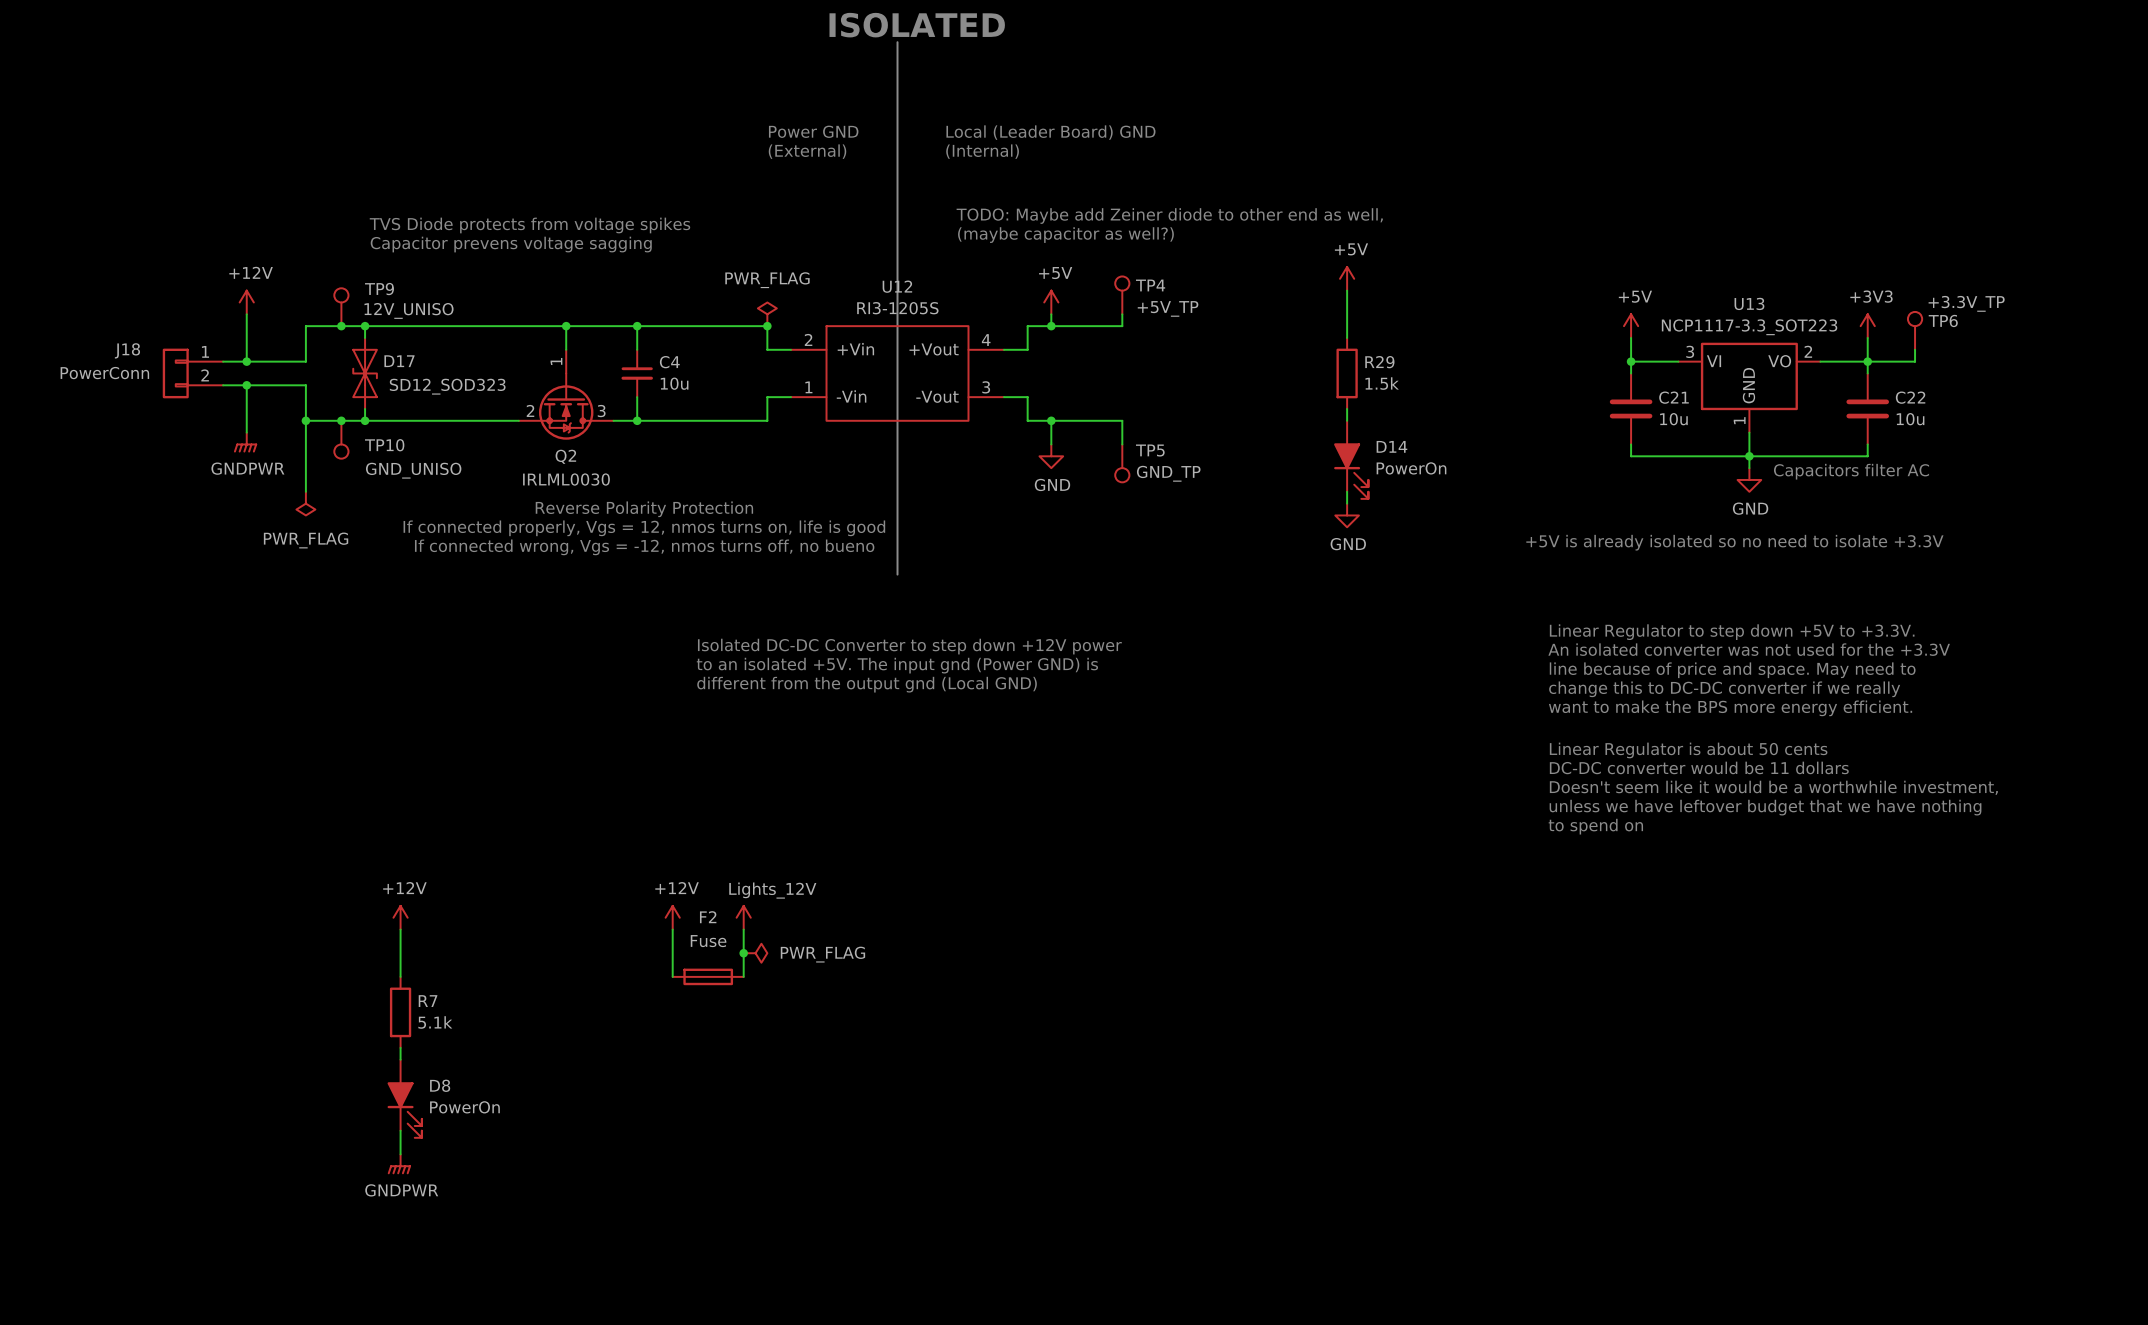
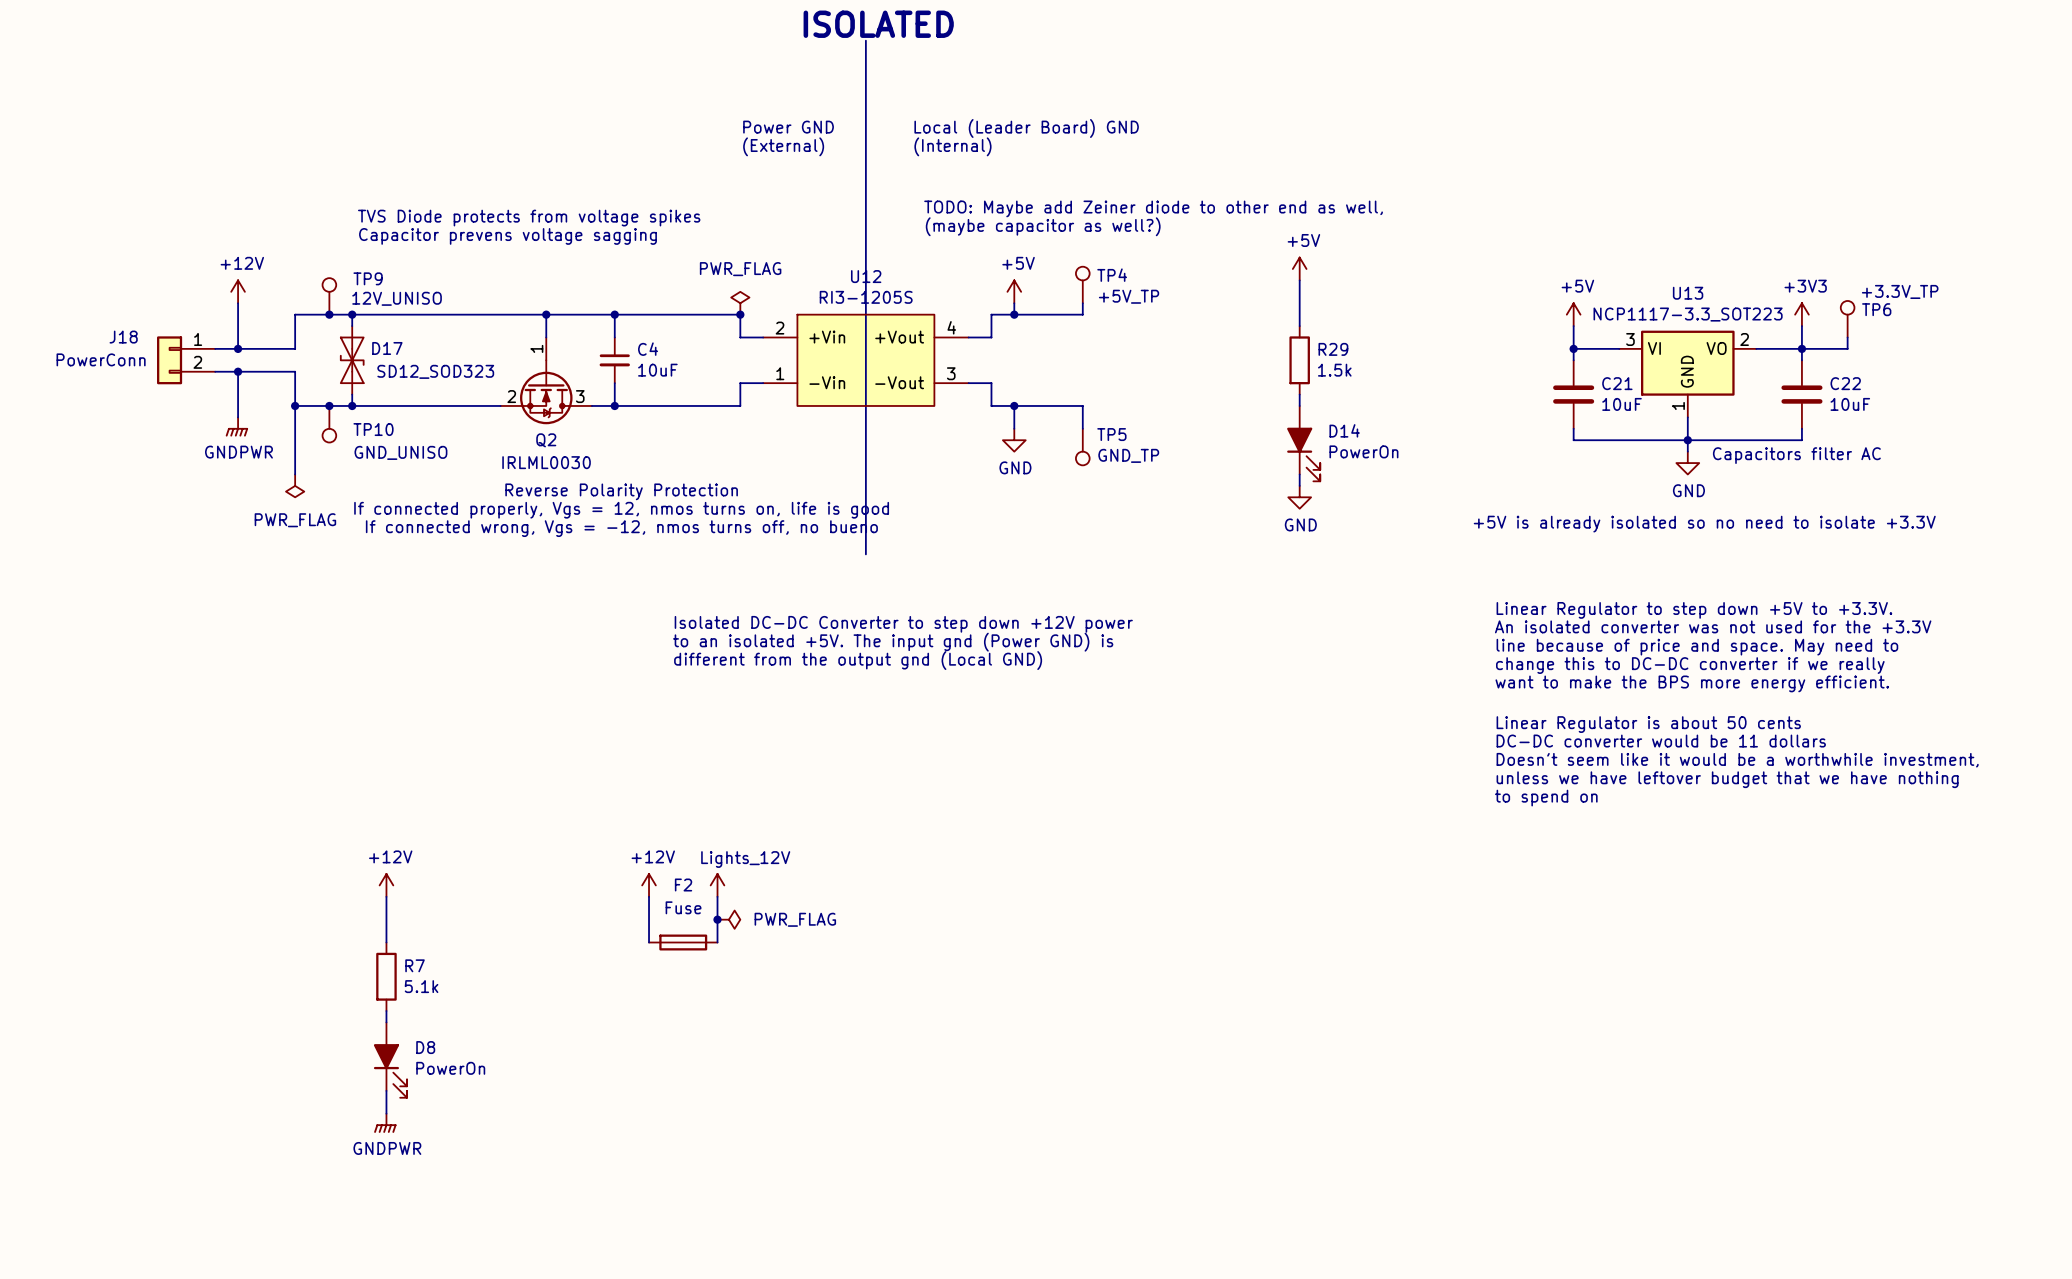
C4 value: 10u (674, 383) -> 10uF (657, 370)
C21 value: 10u (1673, 419) -> 10uF (1622, 404)
C22 value: 10u (1910, 419) -> 10uF (1850, 404)

